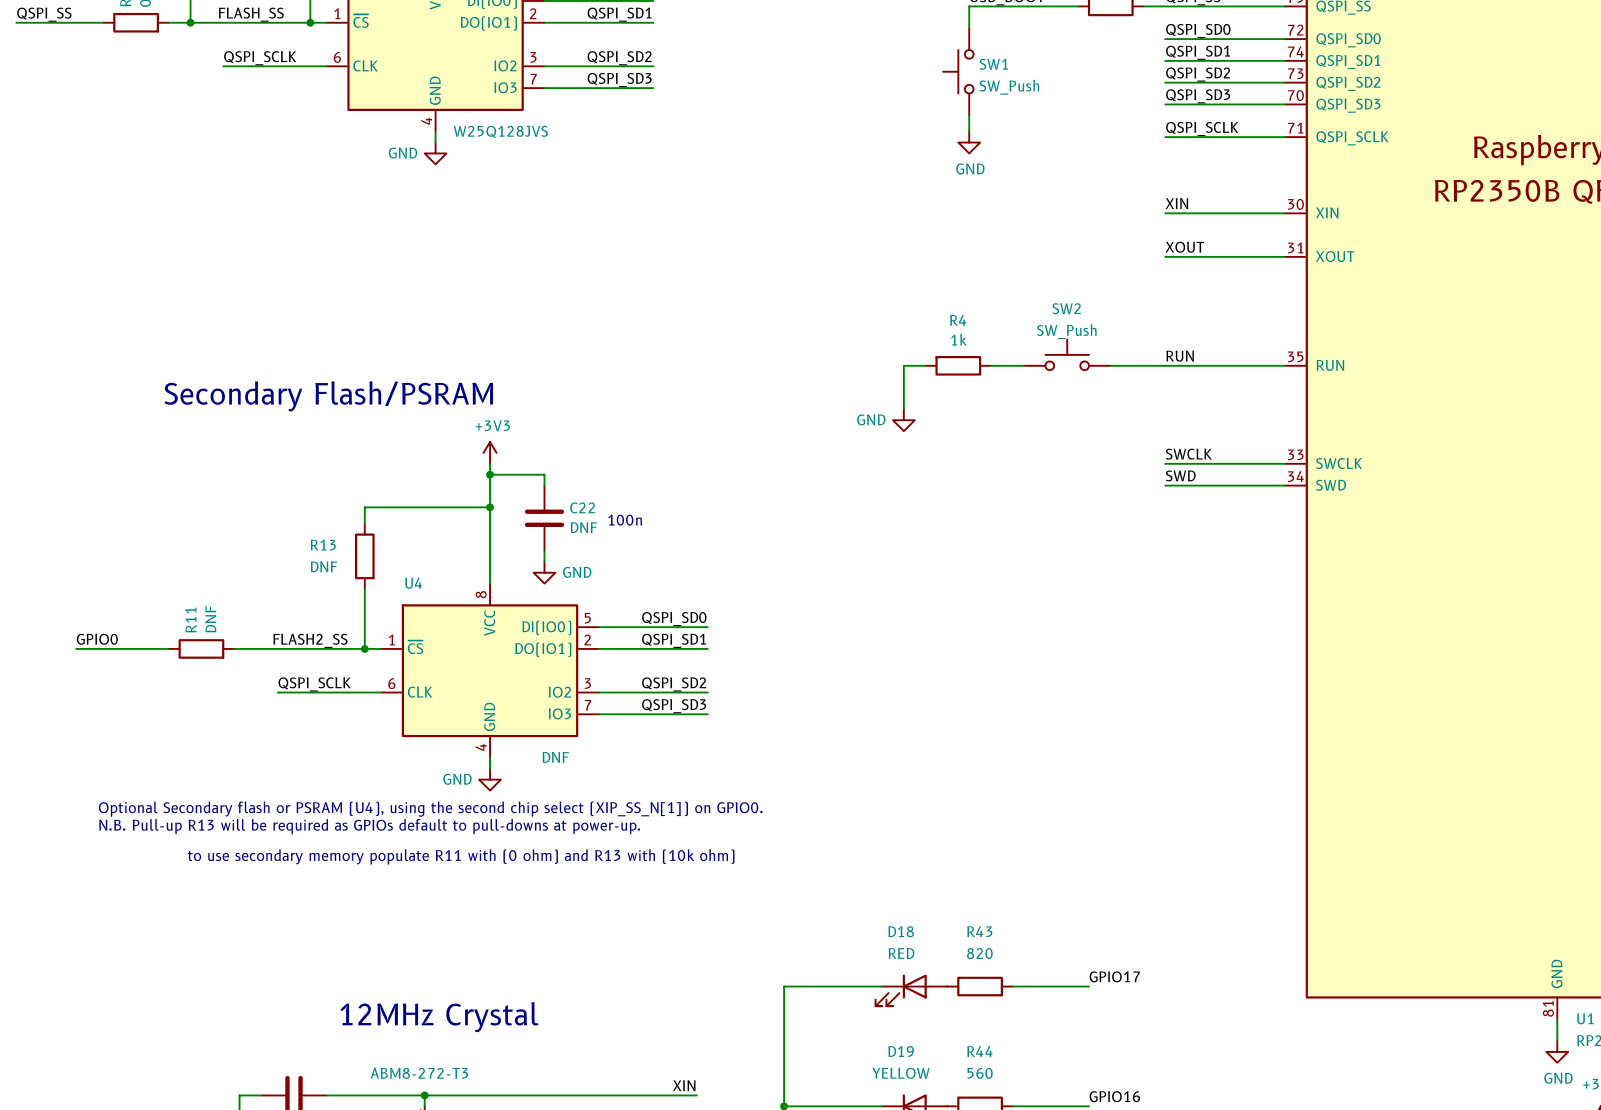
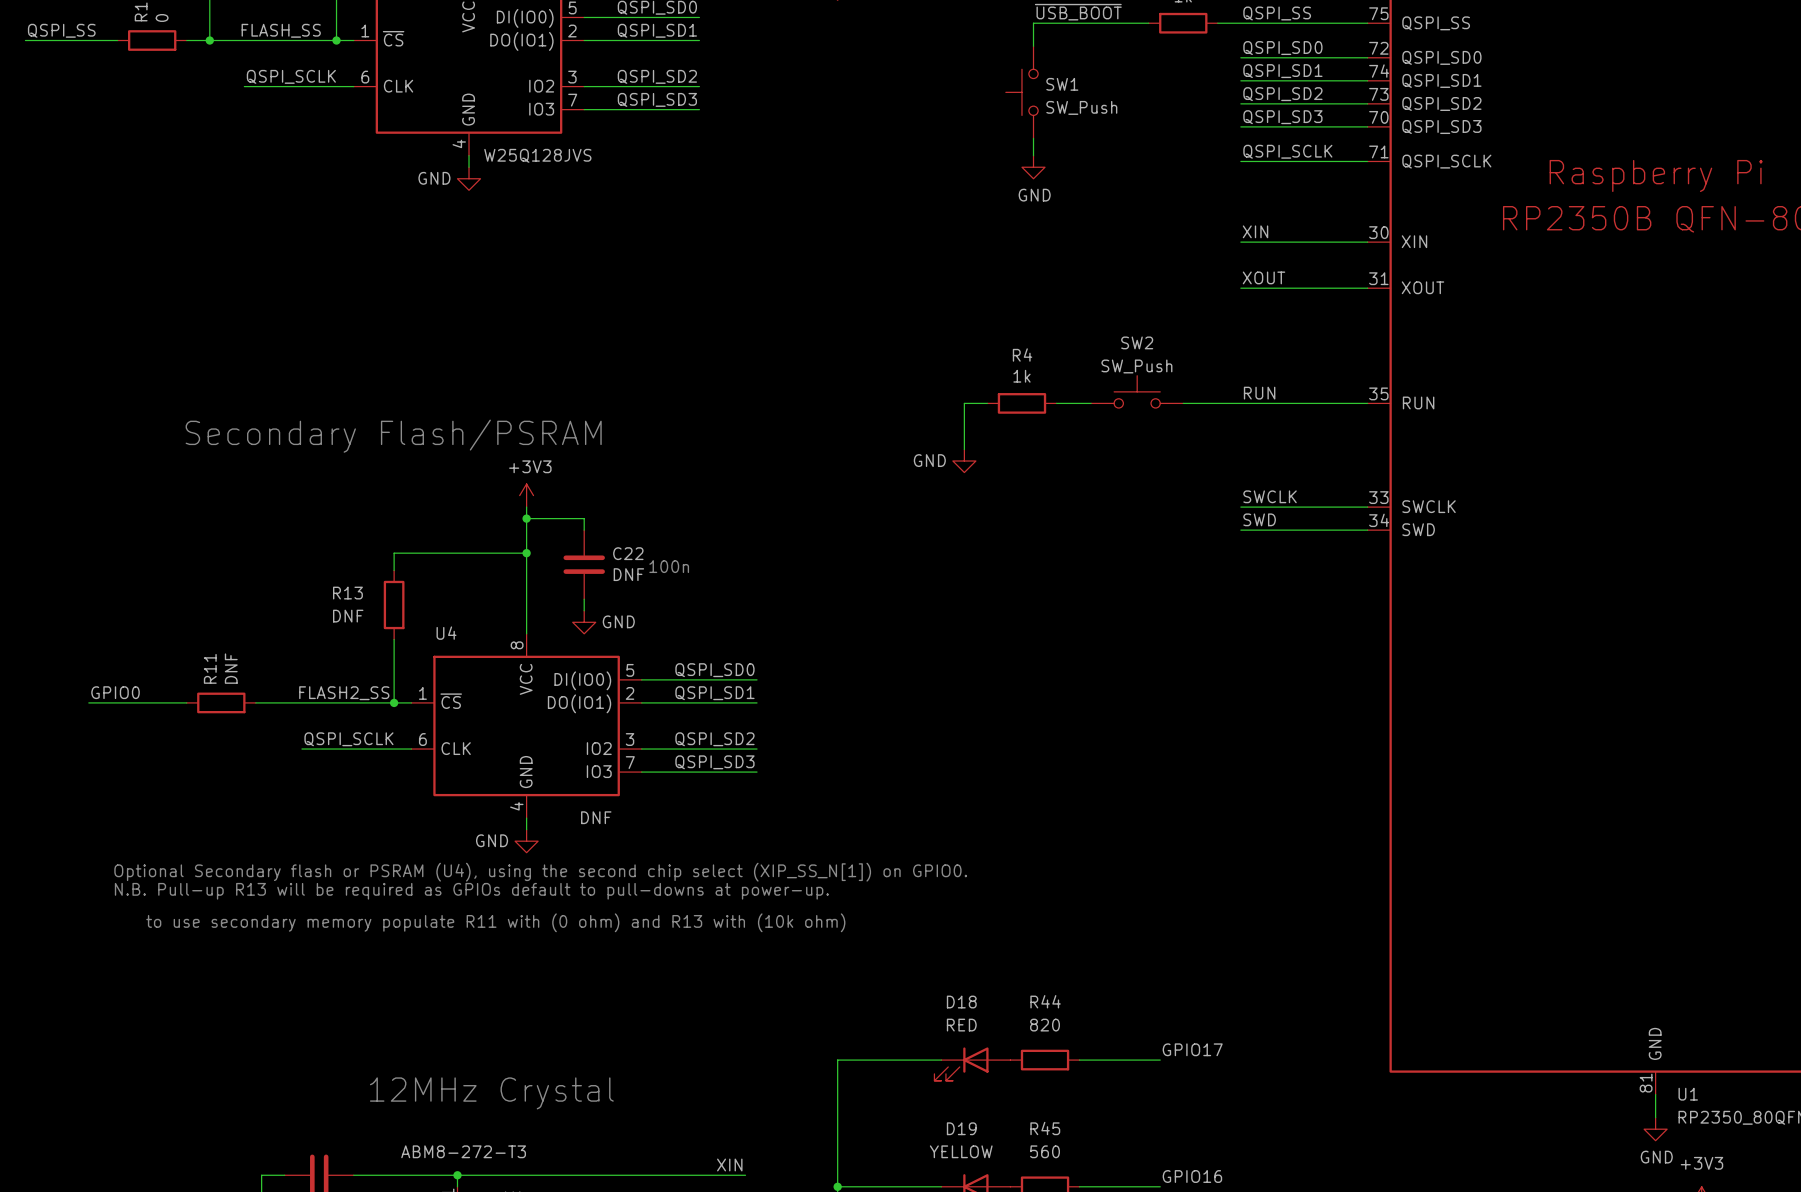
R43 name: R43 (979, 931) -> R44 (1045, 1001)
R44 name: R44 (979, 1051) -> R45 (1045, 1128)

